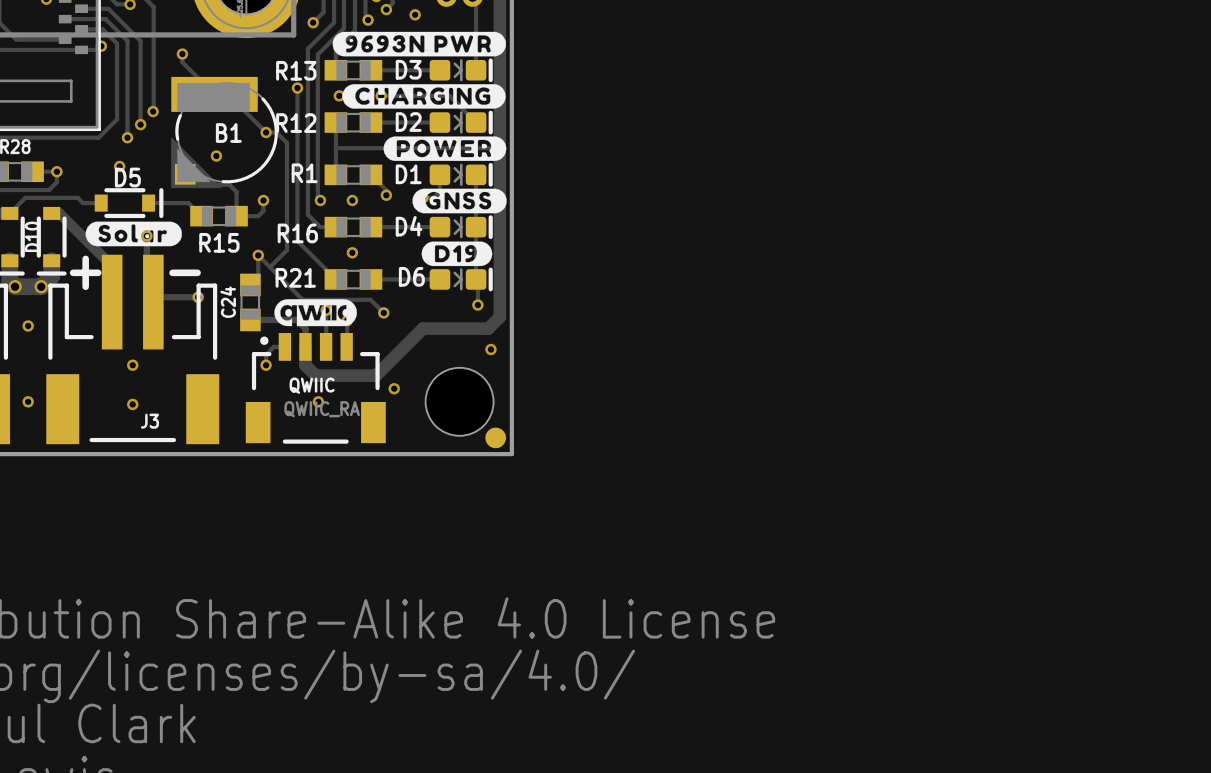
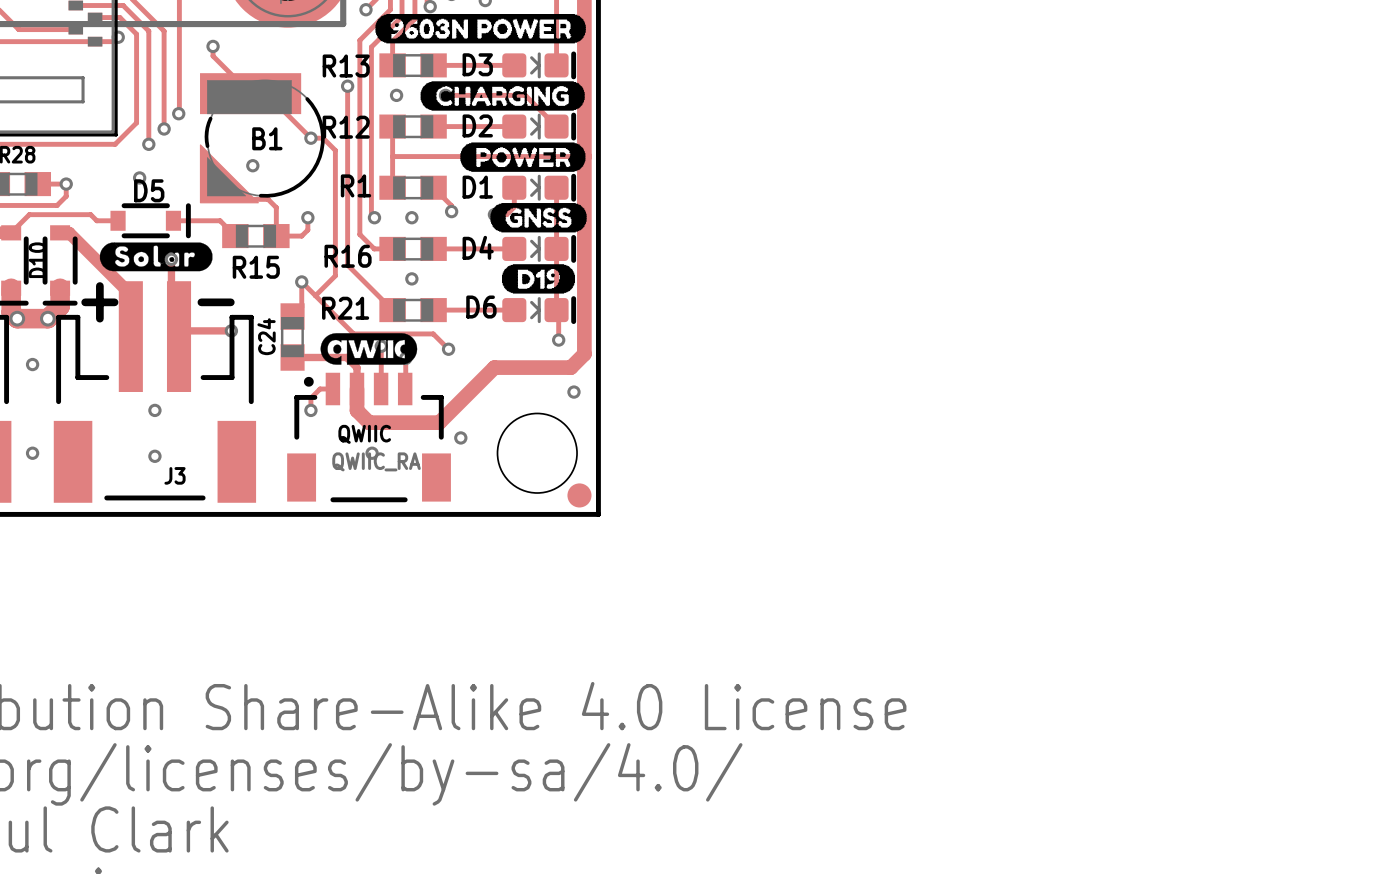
drawing shape: [332, 31, 506, 57] -> [375, 14, 586, 44]
drawing shape: [342, 84, 506, 109] -> [420, 81, 585, 111]
drawing shape: [383, 136, 507, 161] -> [460, 142, 586, 172]
drawing shape: [412, 188, 507, 214] -> [490, 203, 587, 233]
drawing shape: [421, 241, 493, 267] -> [502, 264, 575, 294]

